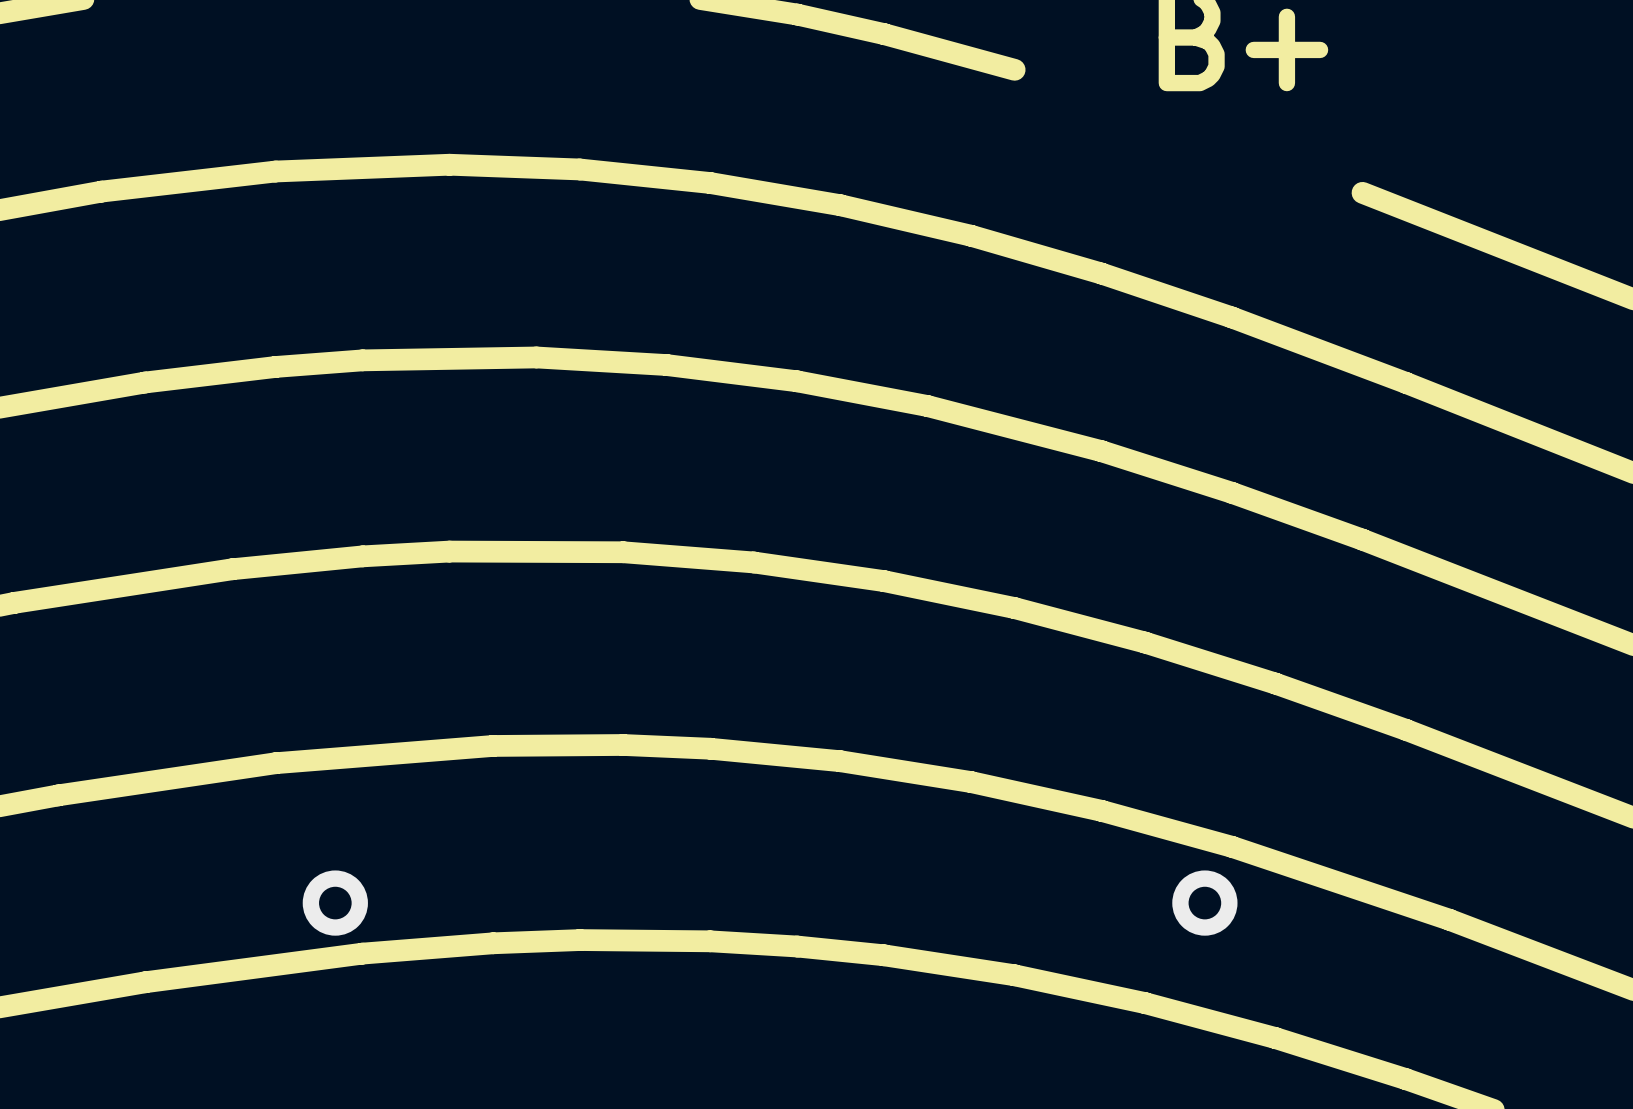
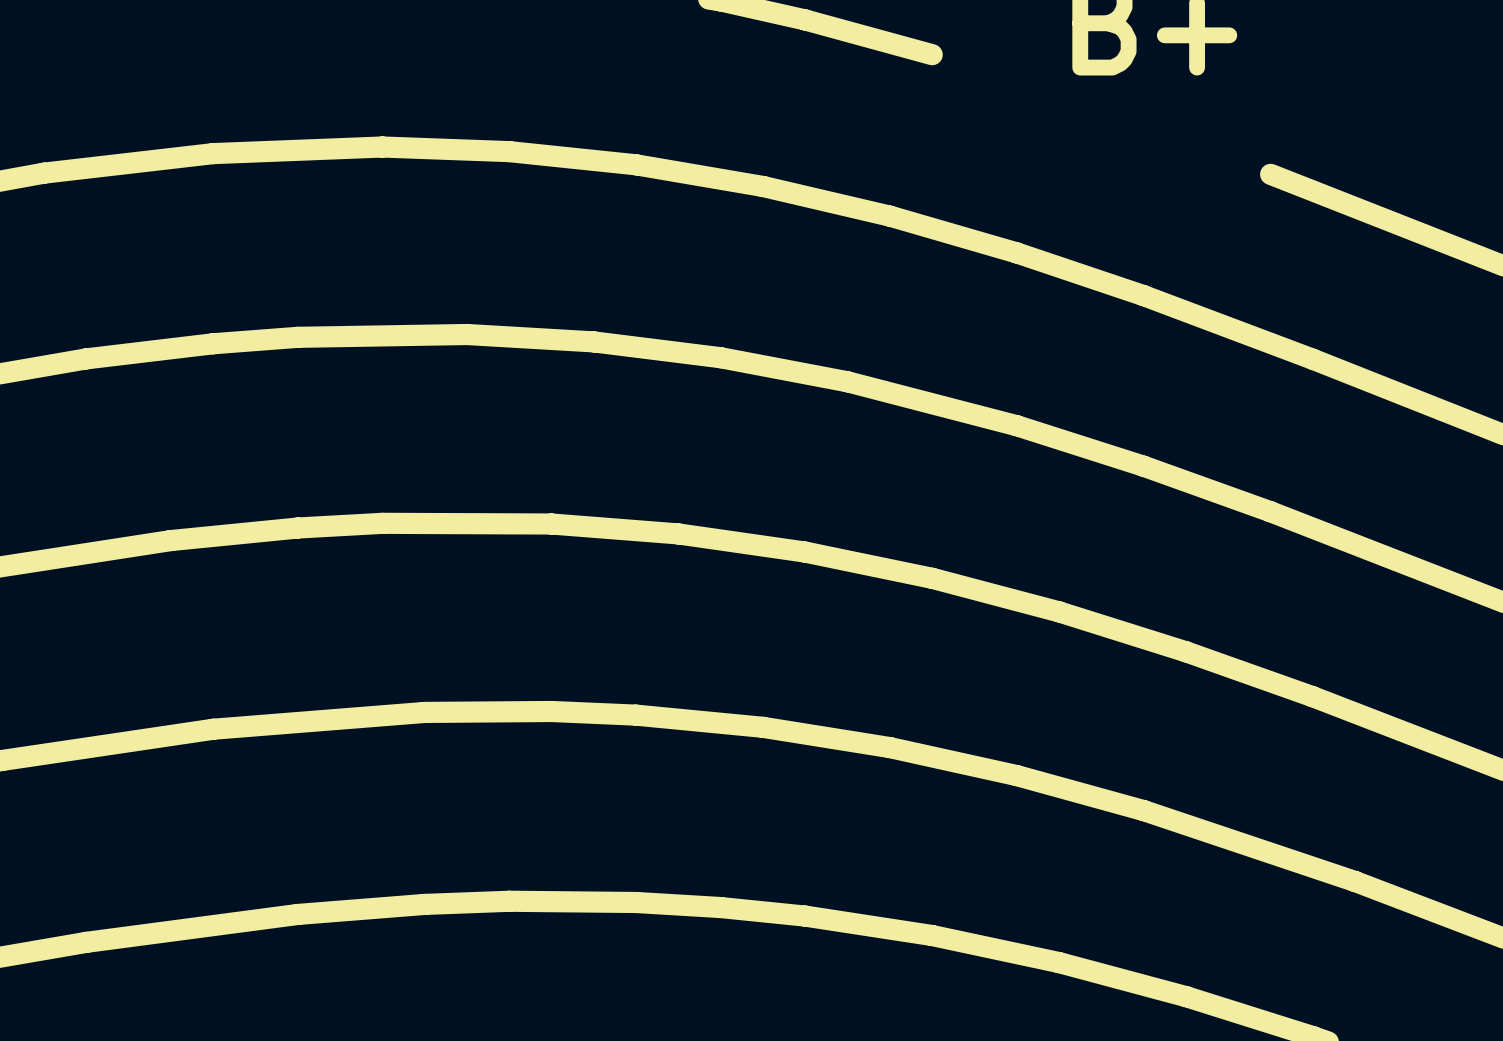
via: (335, 903) -> none
via: (1204, 903) -> none

